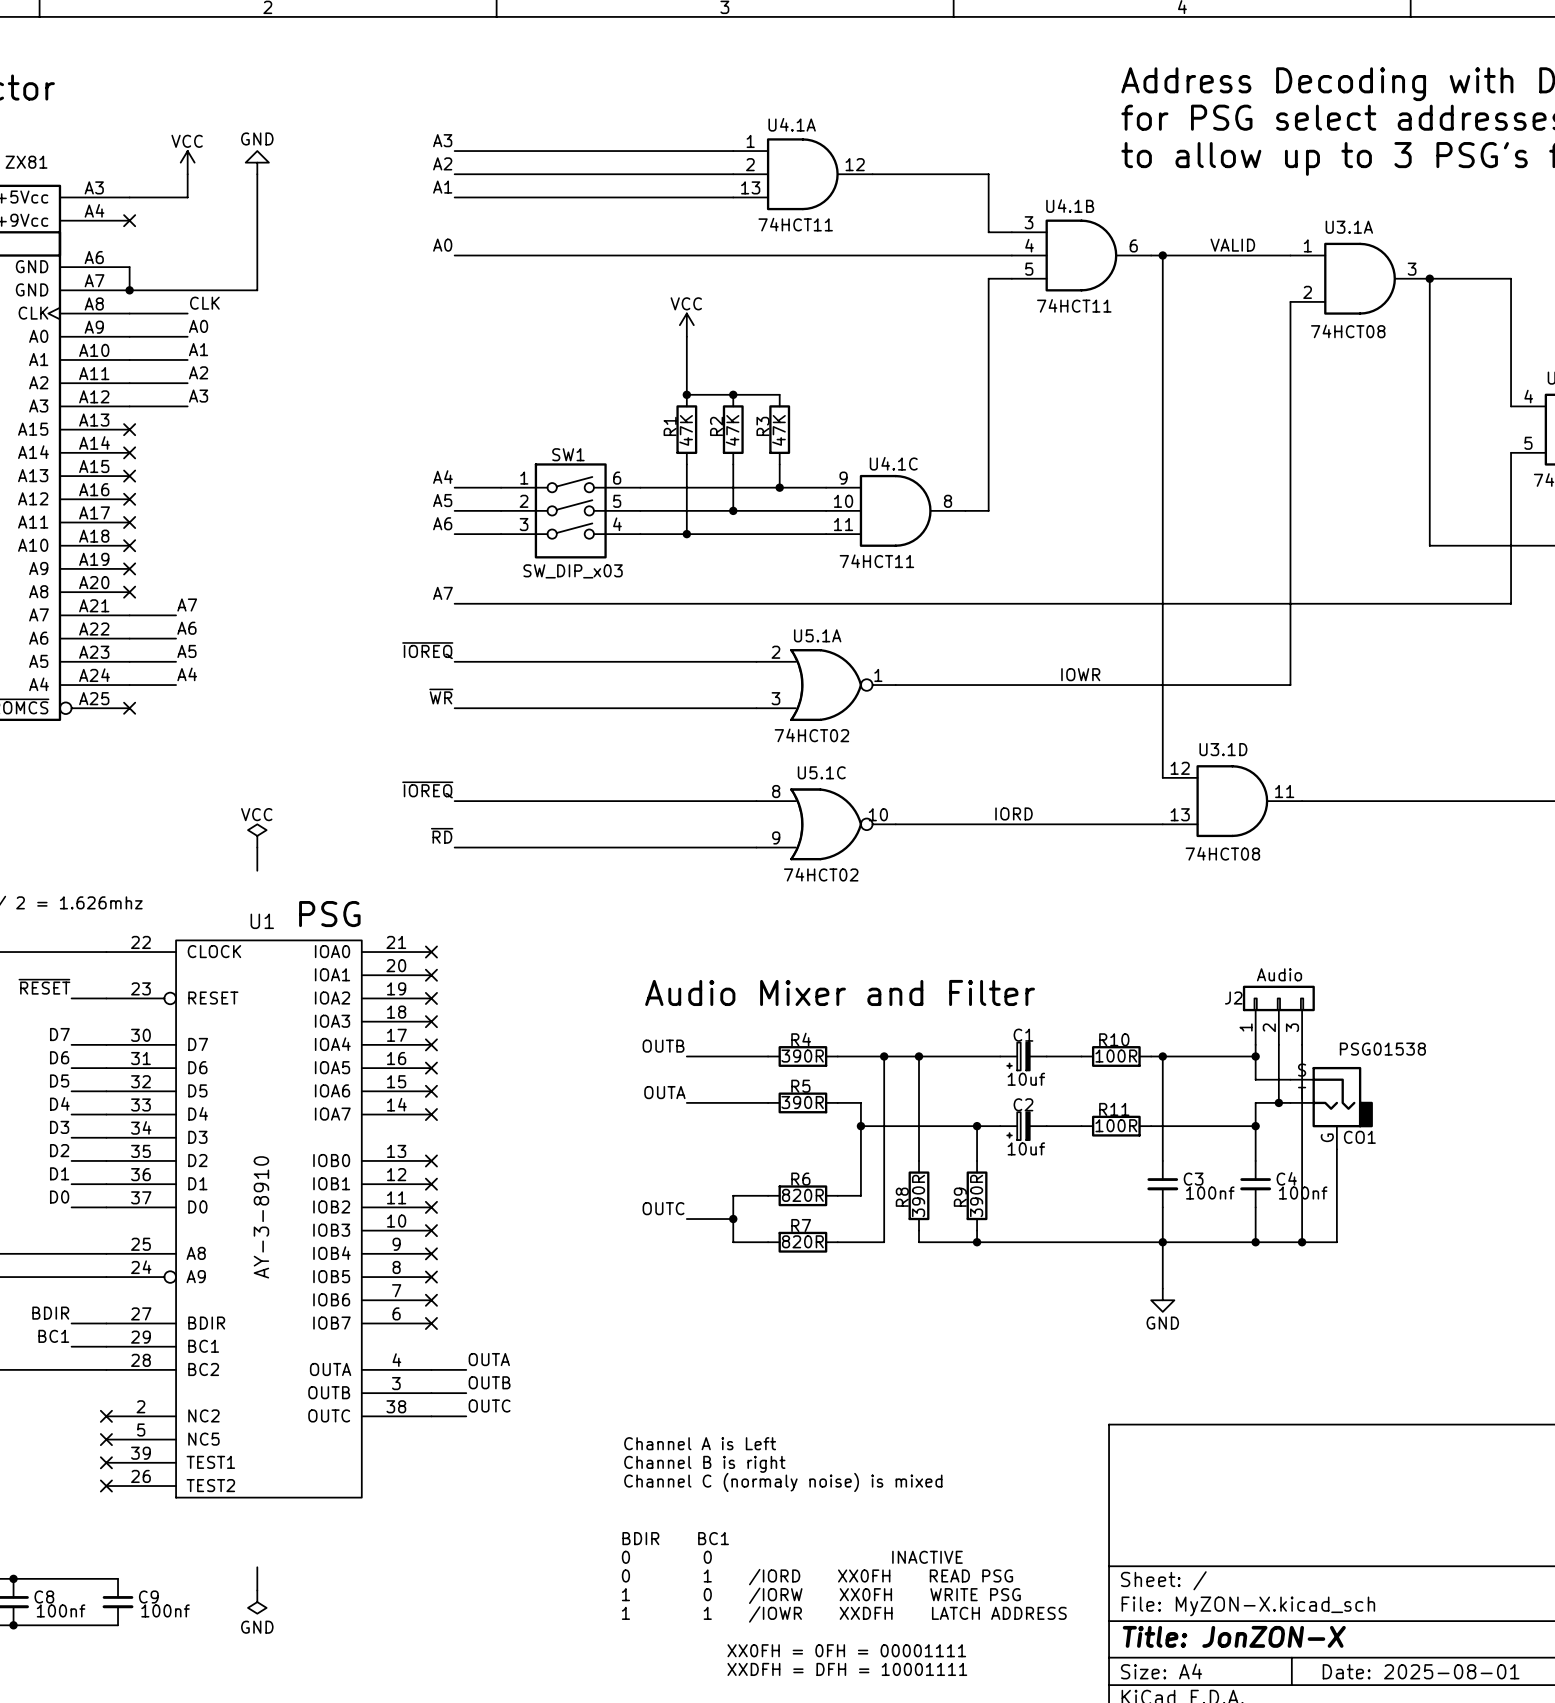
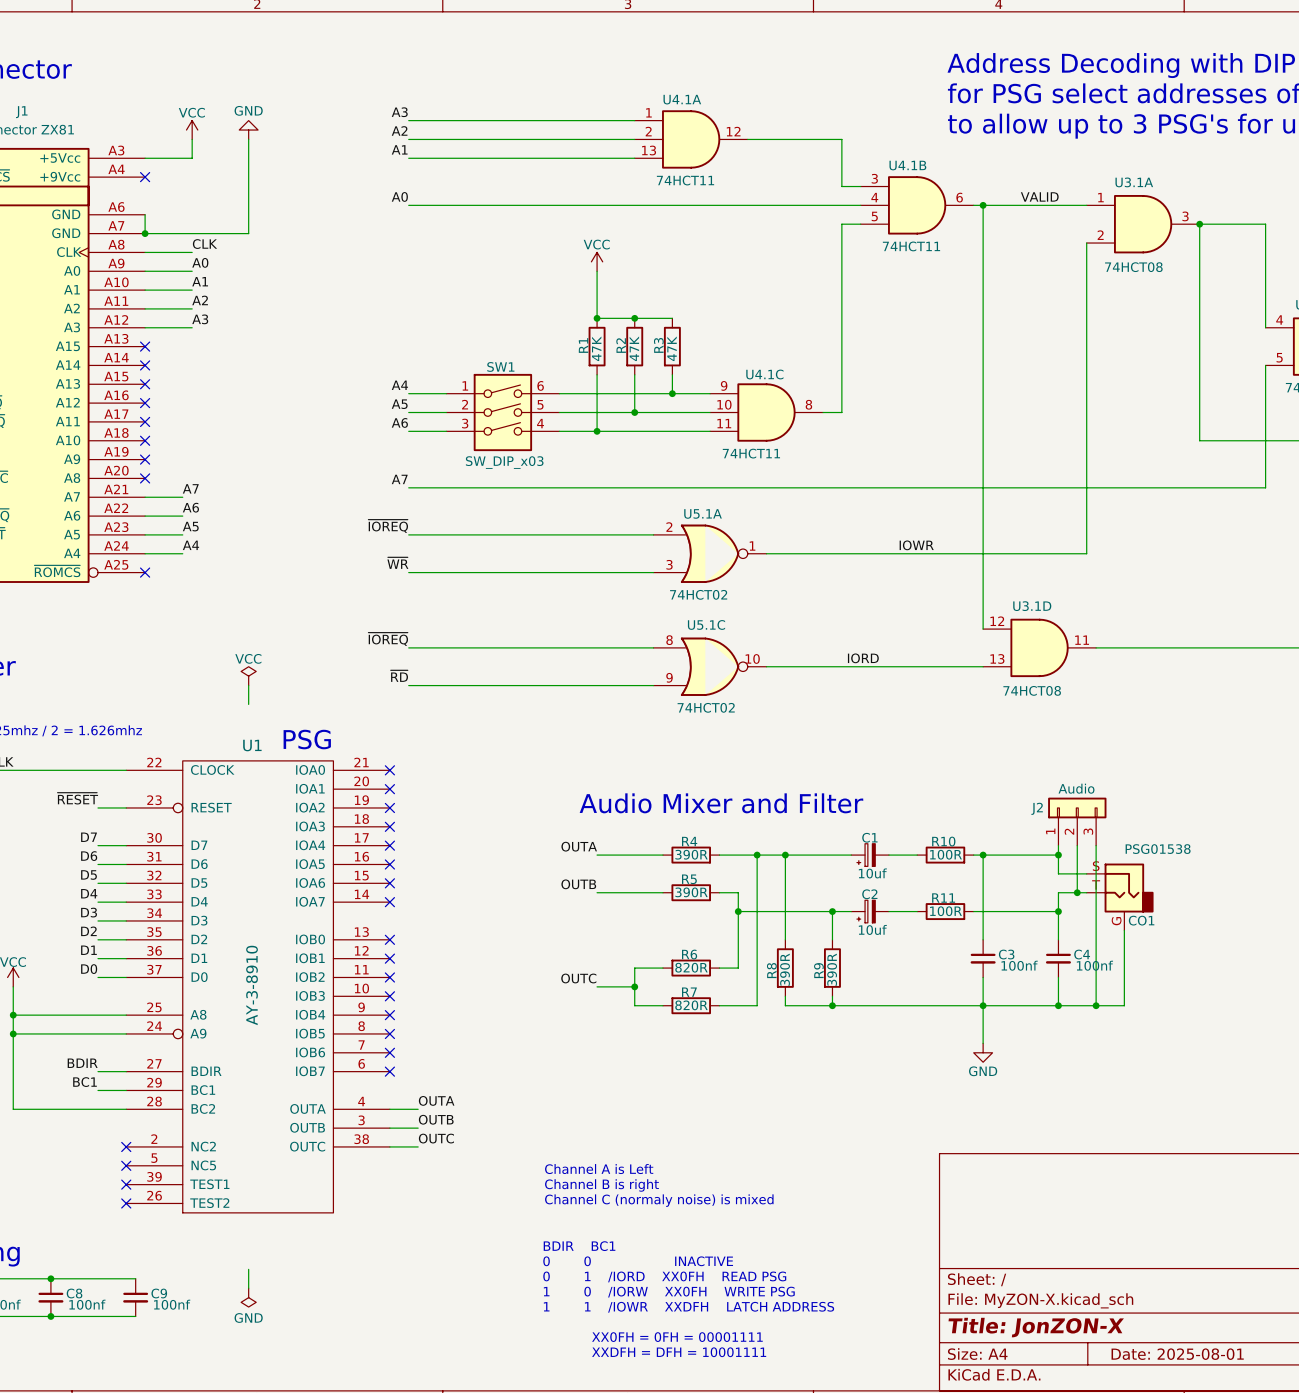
label: OUTB (663, 1046) -> OUTA (579, 846)
label: OUTA (664, 1092) -> OUTB (578, 884)

